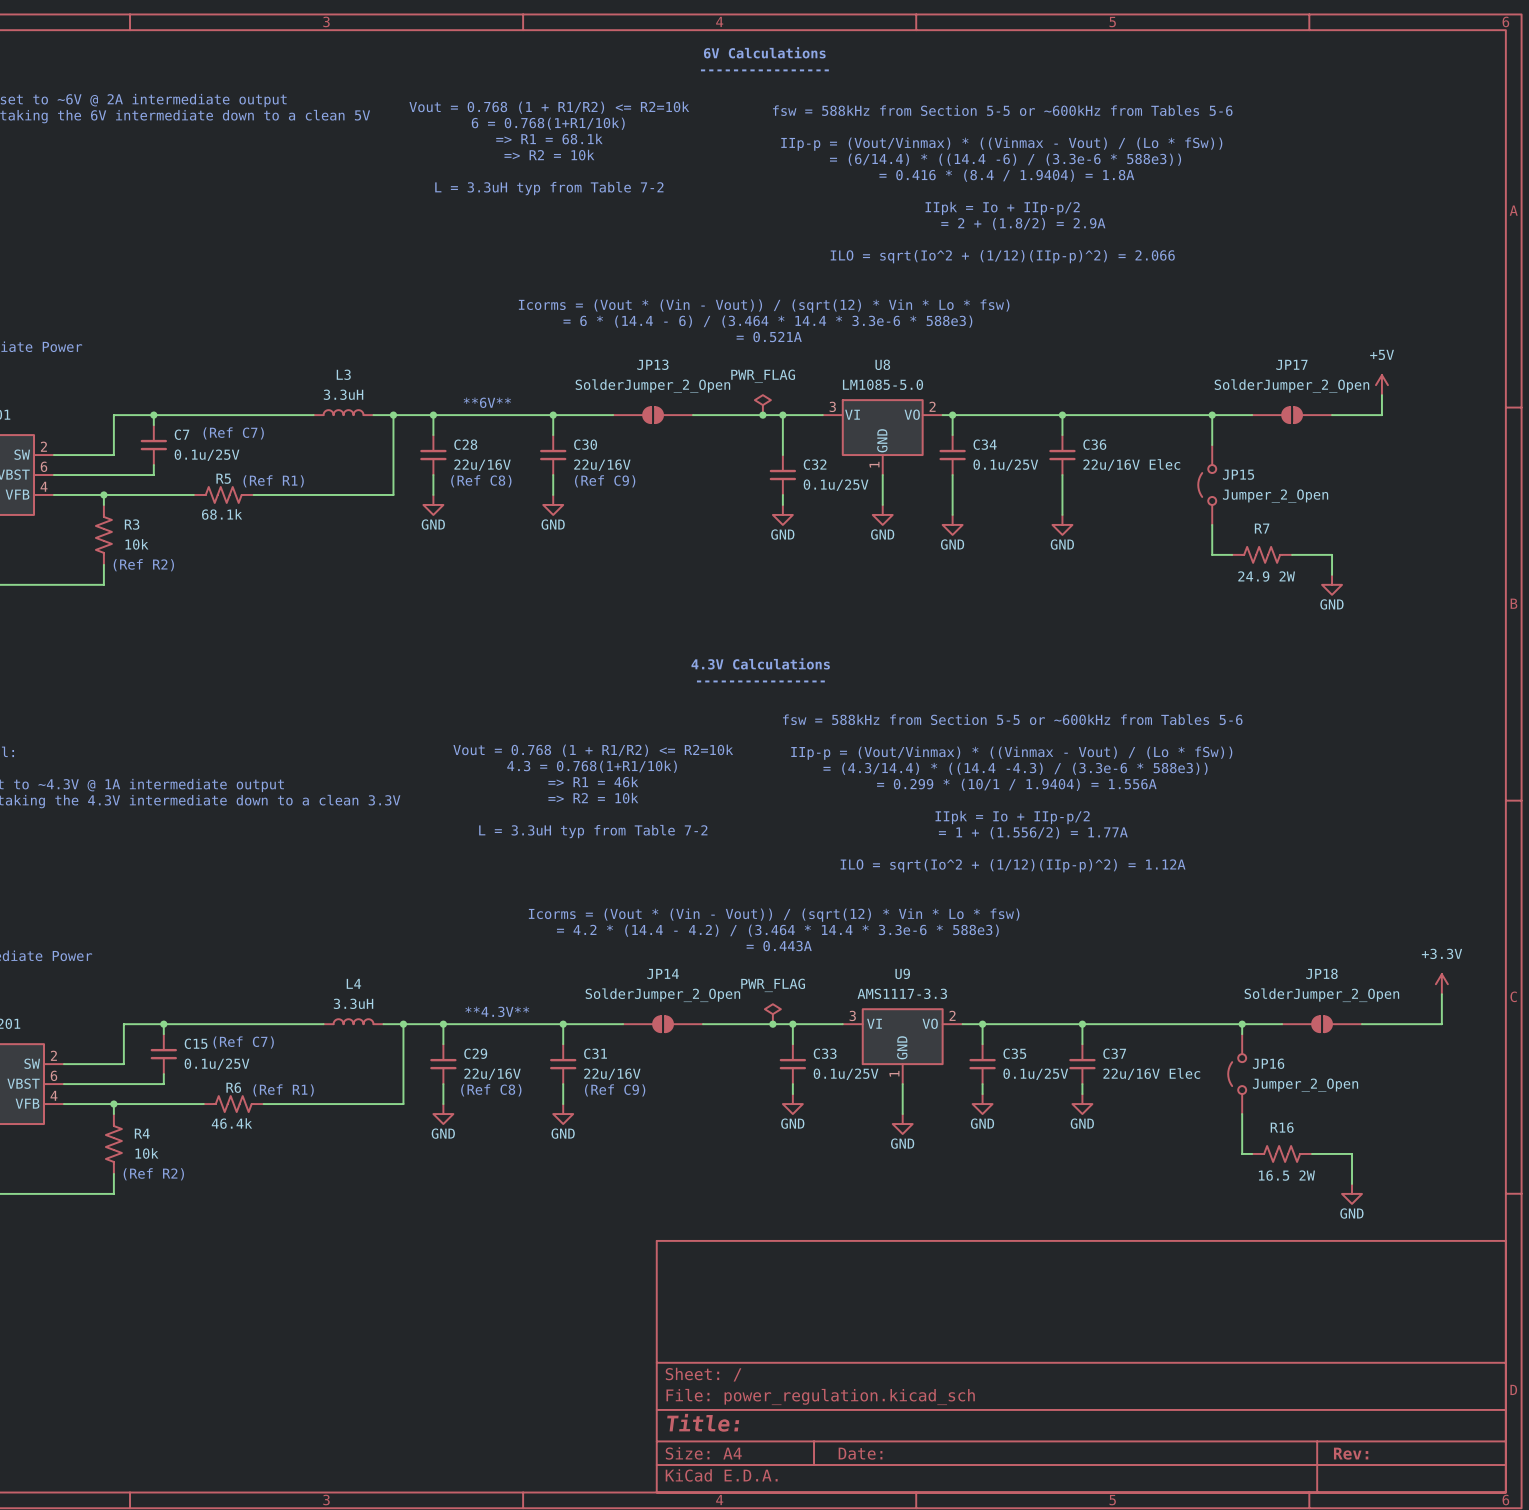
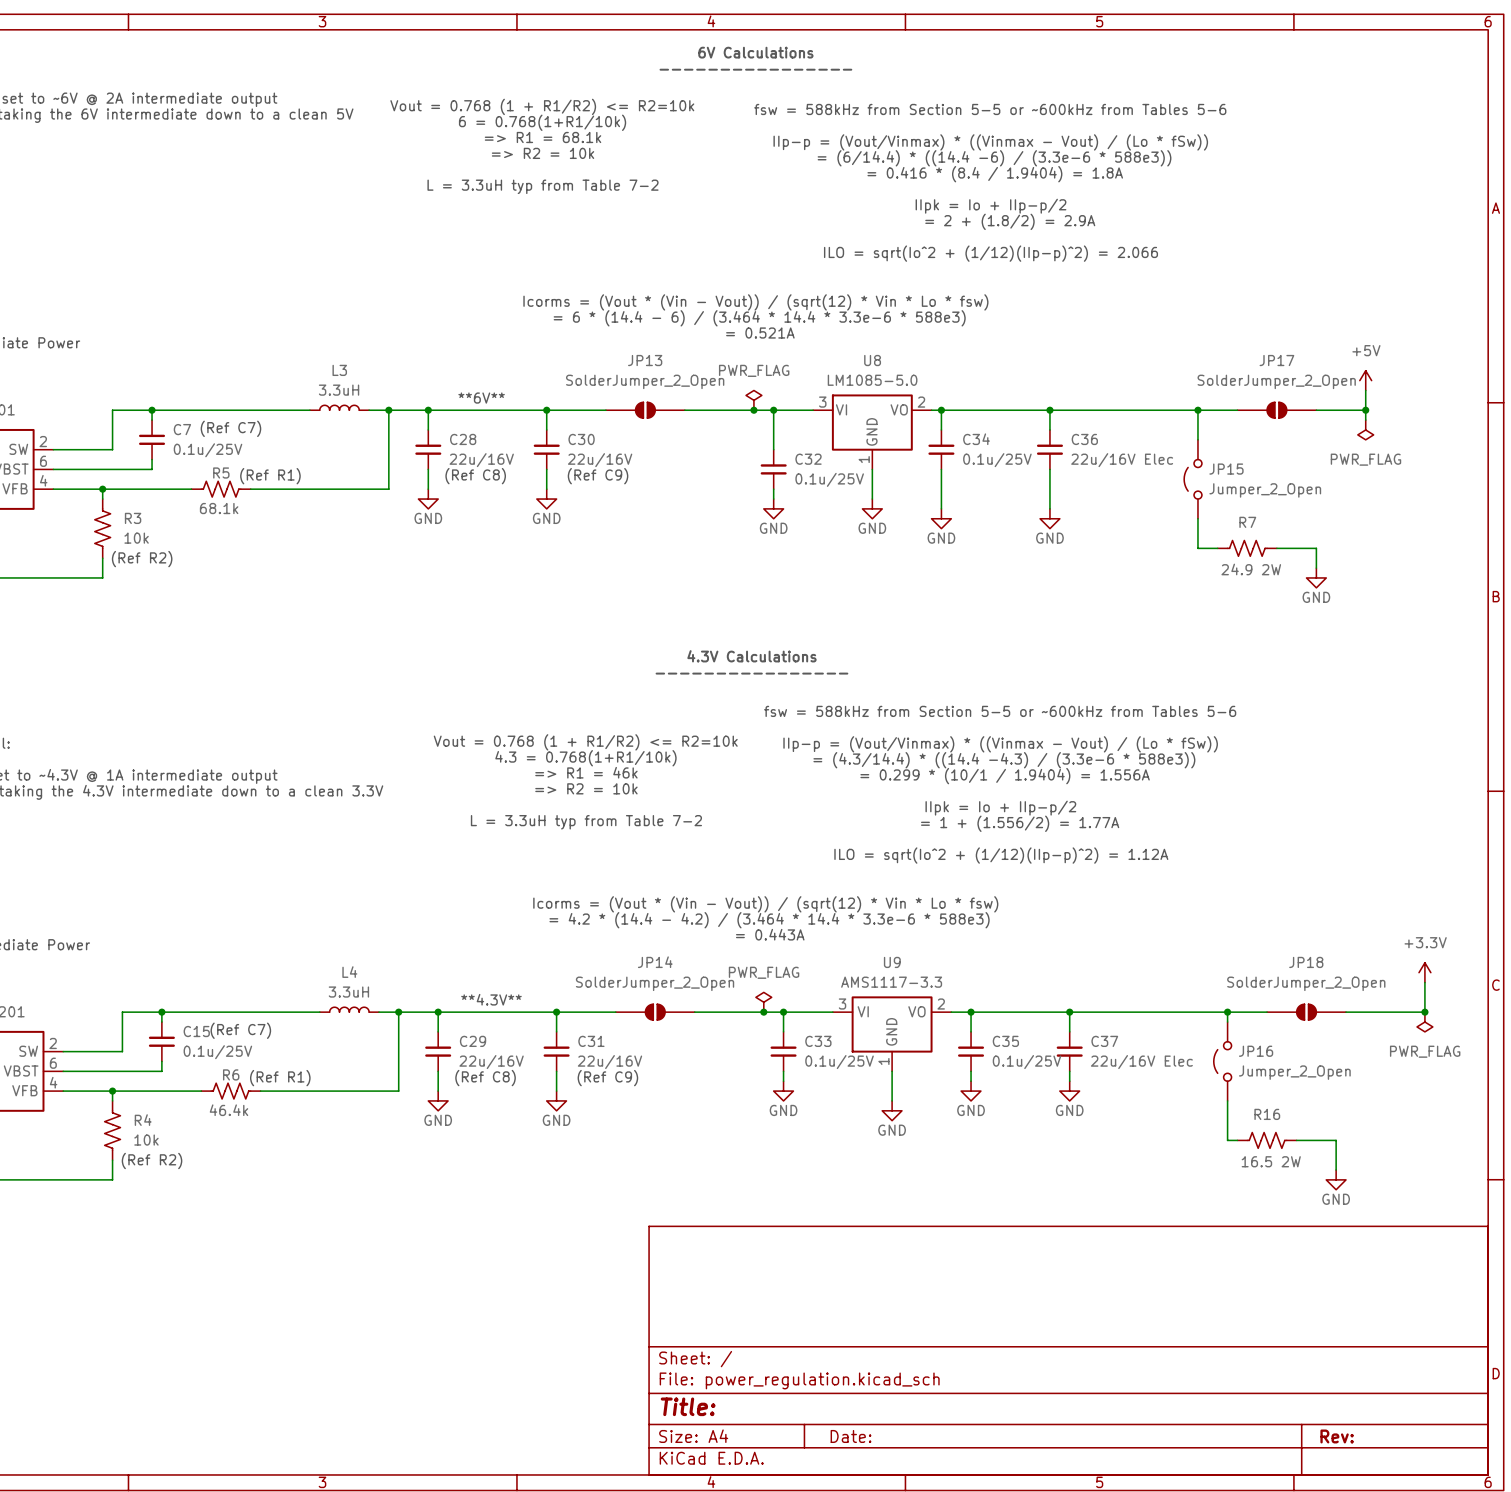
wire: none -> (1365, 410) (1365, 420)
junction: none -> (1365, 410)
power symbol: none -> PWR_FLAG (1365, 429)
junction: none -> (1424, 1012)
power symbol: none -> PWR_FLAG (1424, 1022)

